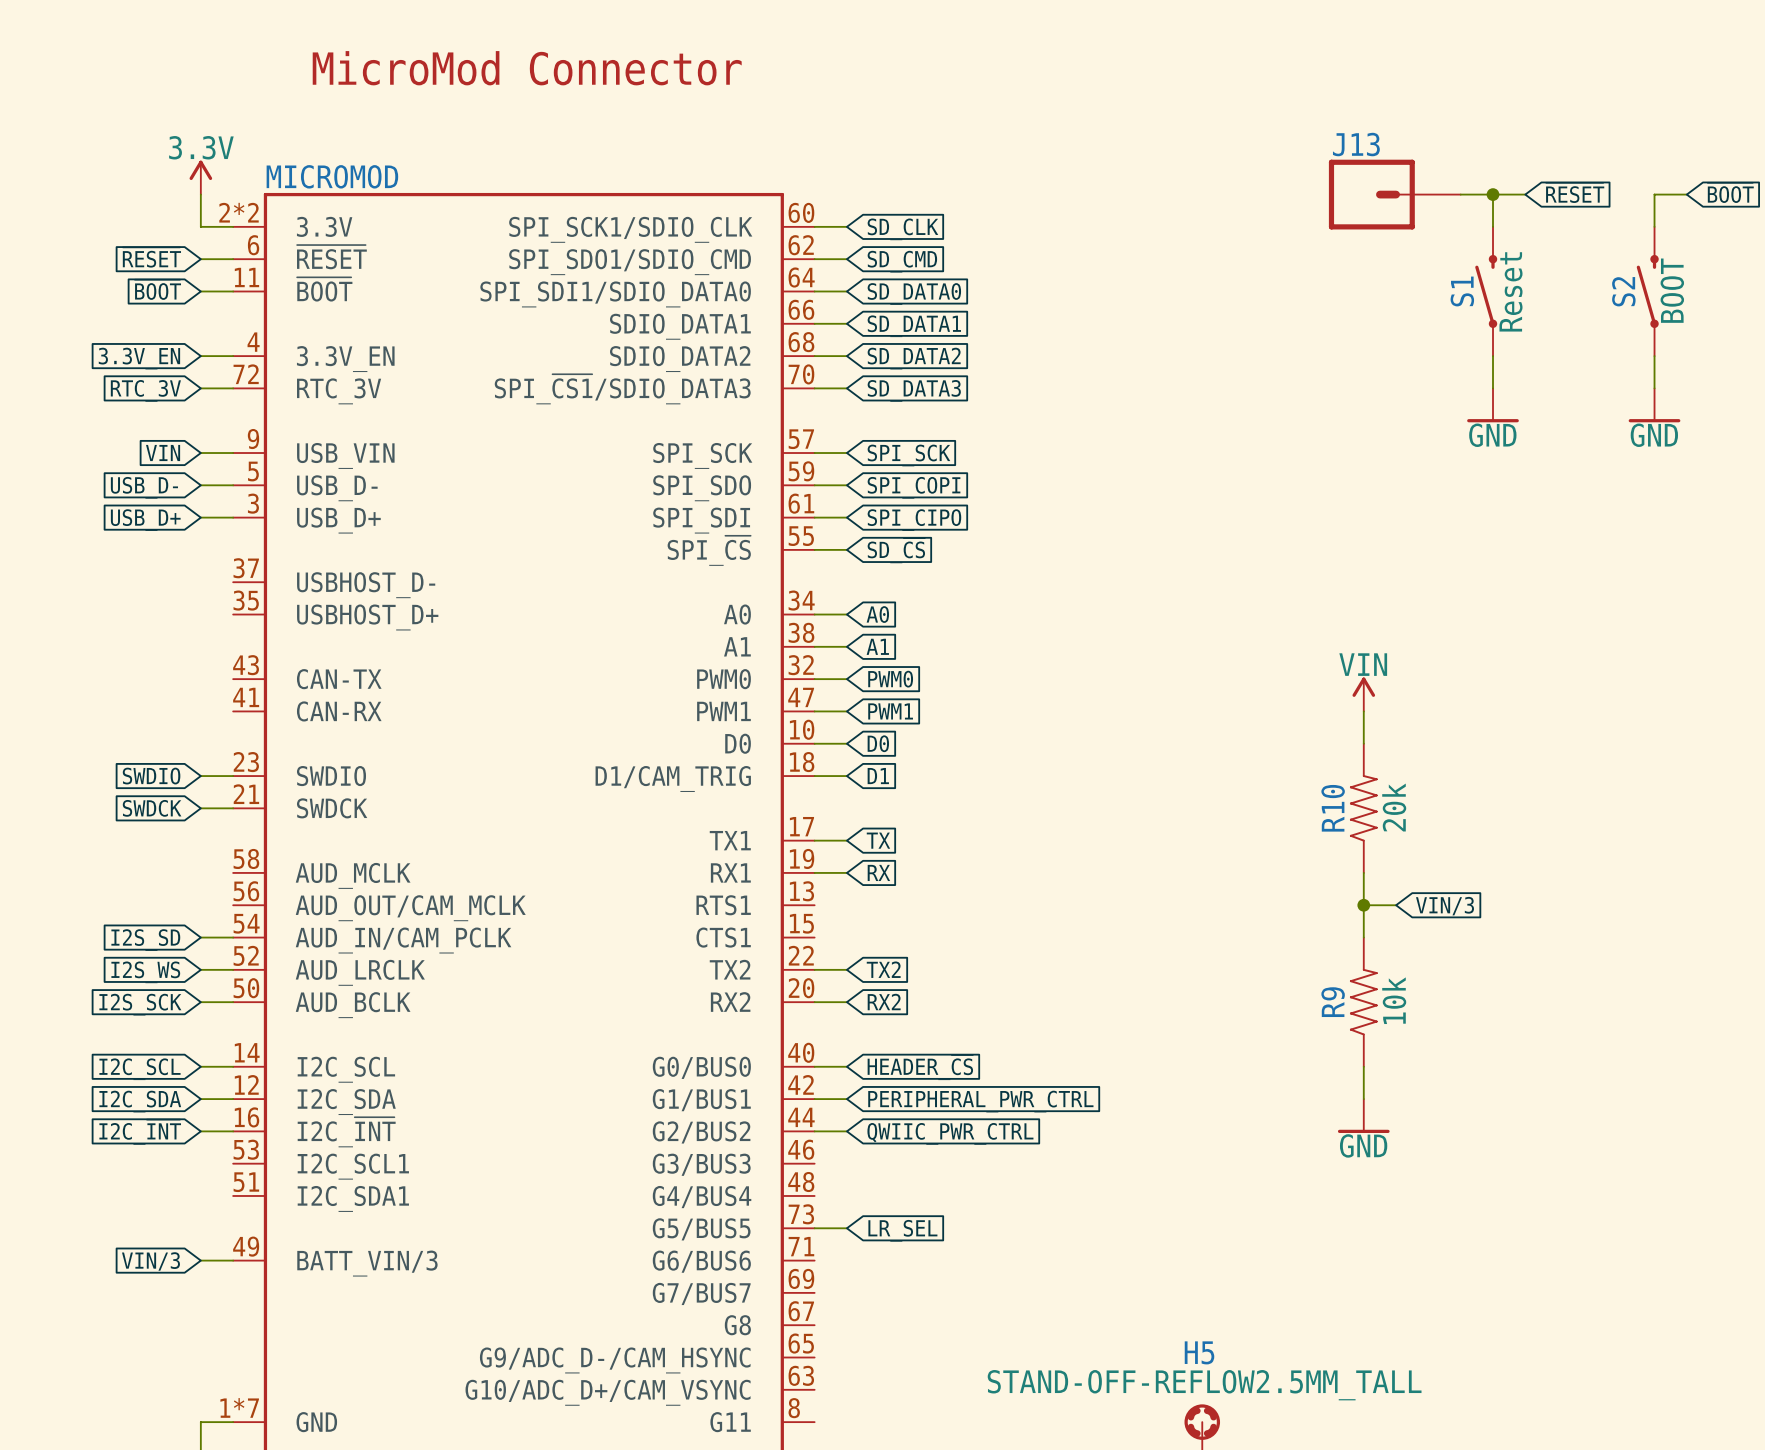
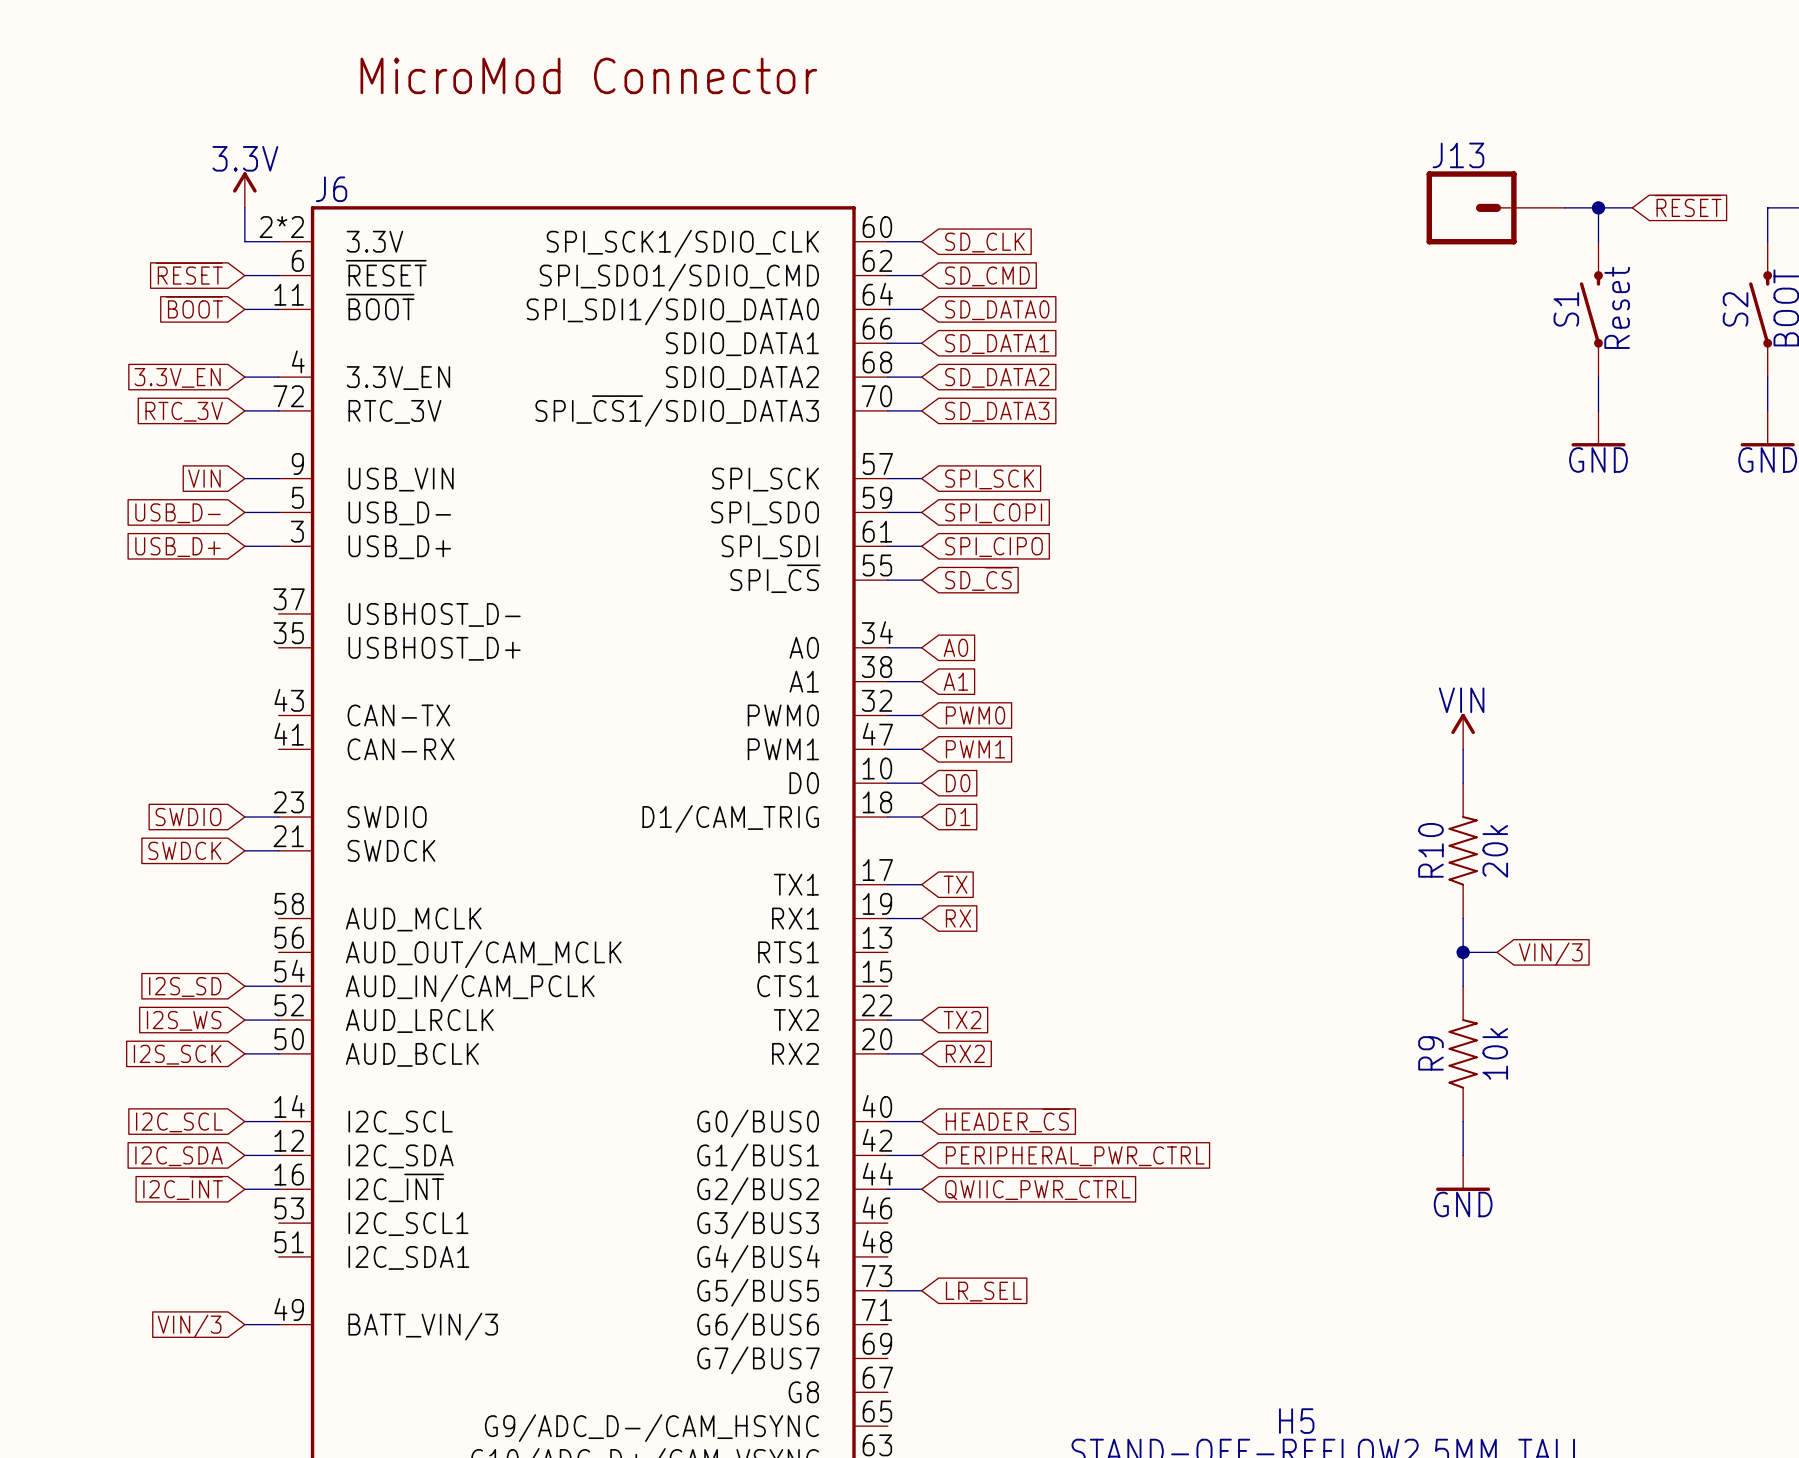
MICROMOD name: MICROMOD (332, 176) -> J6 (331, 189)

